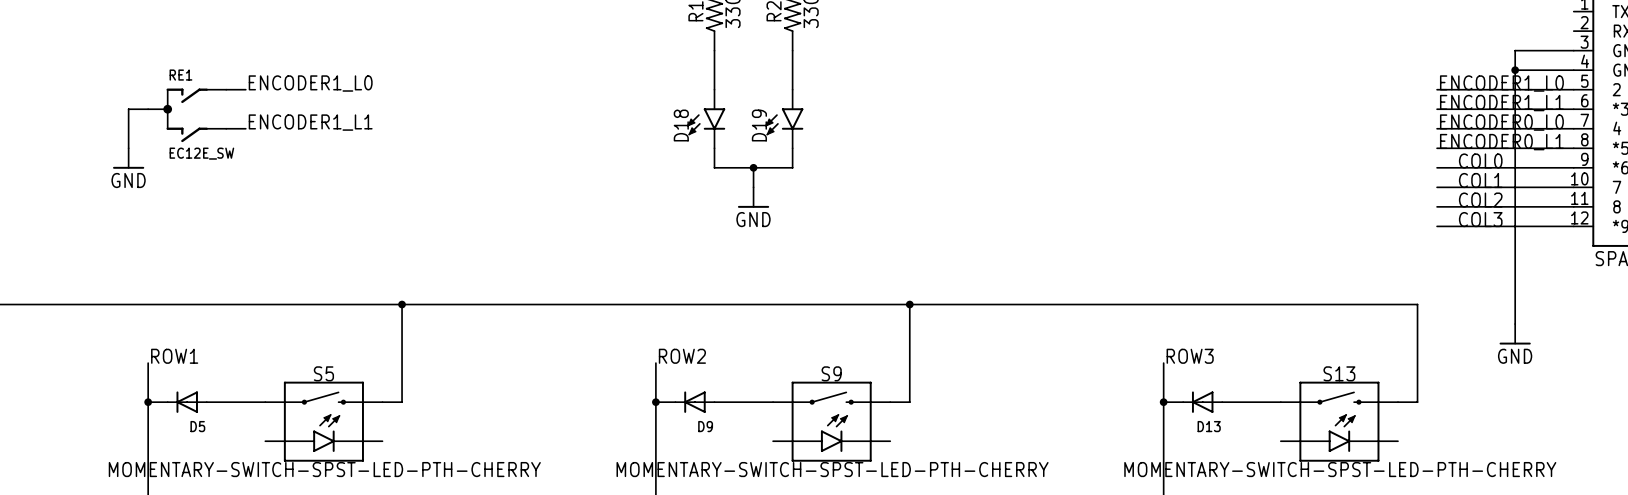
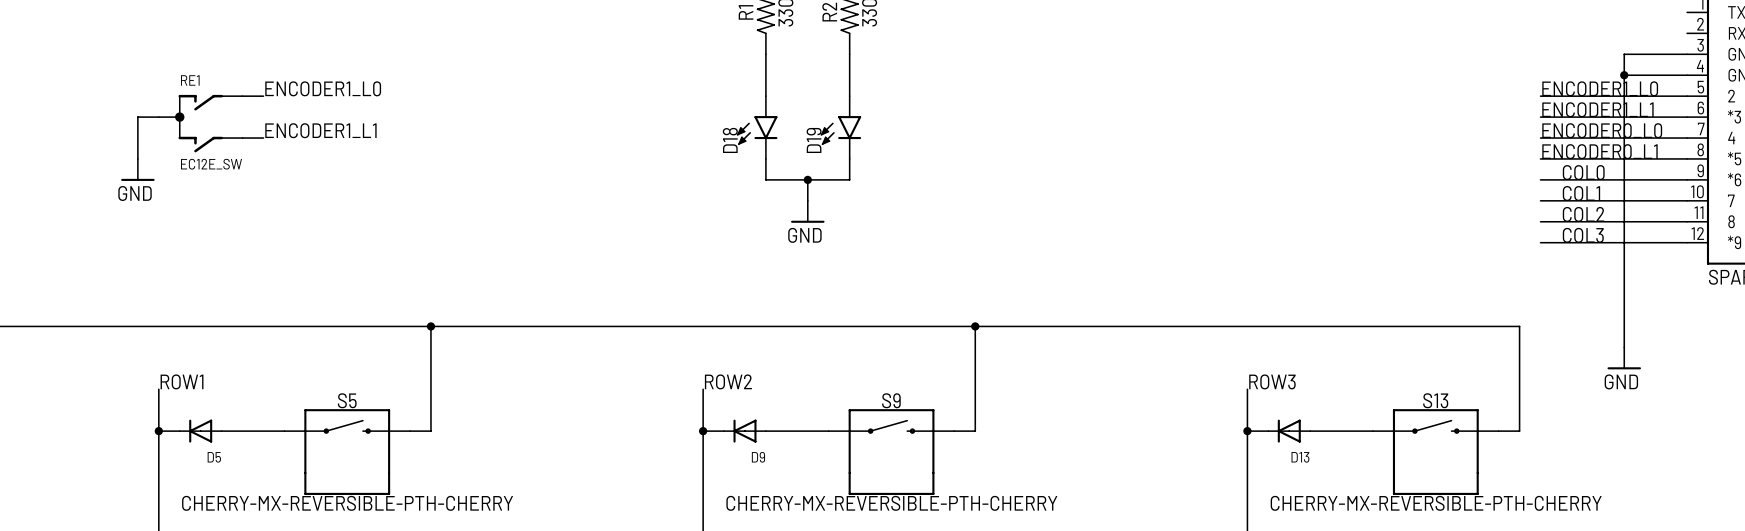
S5 symbol: [265, 381, 383, 462] -> [284, 409, 411, 495]
S9 symbol: [773, 381, 891, 462] -> [828, 409, 955, 495]
S13 symbol: [1280, 381, 1399, 462] -> [1373, 409, 1499, 495]
S5 value: MOMENTARY-SWITCH-SPST-LED-PTH-CHERRY (324, 469) -> CHERRY-MX-REVERSIBLE-PTH-CHERRY (347, 503)
S9 value: MOMENTARY-SWITCH-SPST-LED-PTH-CHERRY (832, 469) -> CHERRY-MX-REVERSIBLE-PTH-CHERRY (891, 503)
S13 value: MOMENTARY-SWITCH-SPST-LED-PTH-CHERRY (1340, 469) -> CHERRY-MX-REVERSIBLE-PTH-CHERRY (1436, 503)

